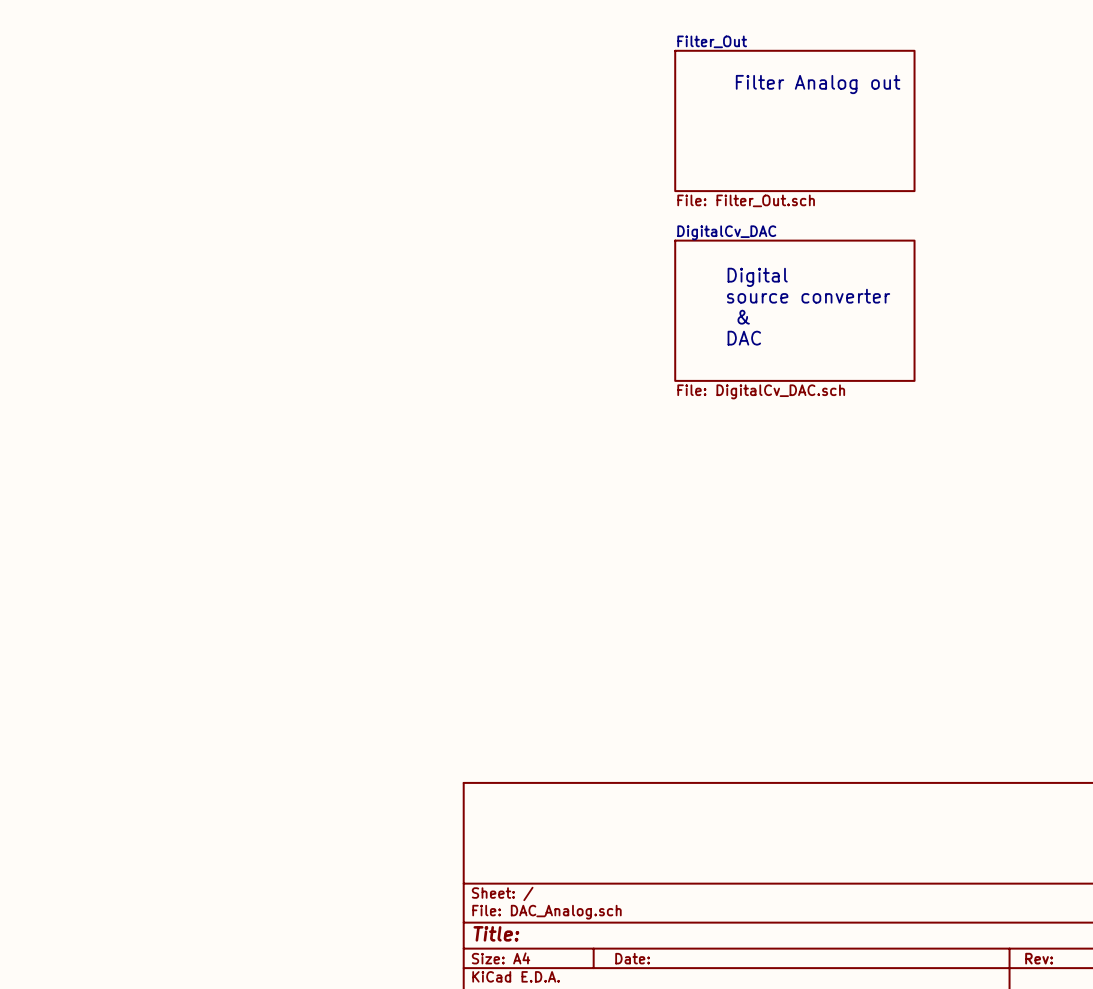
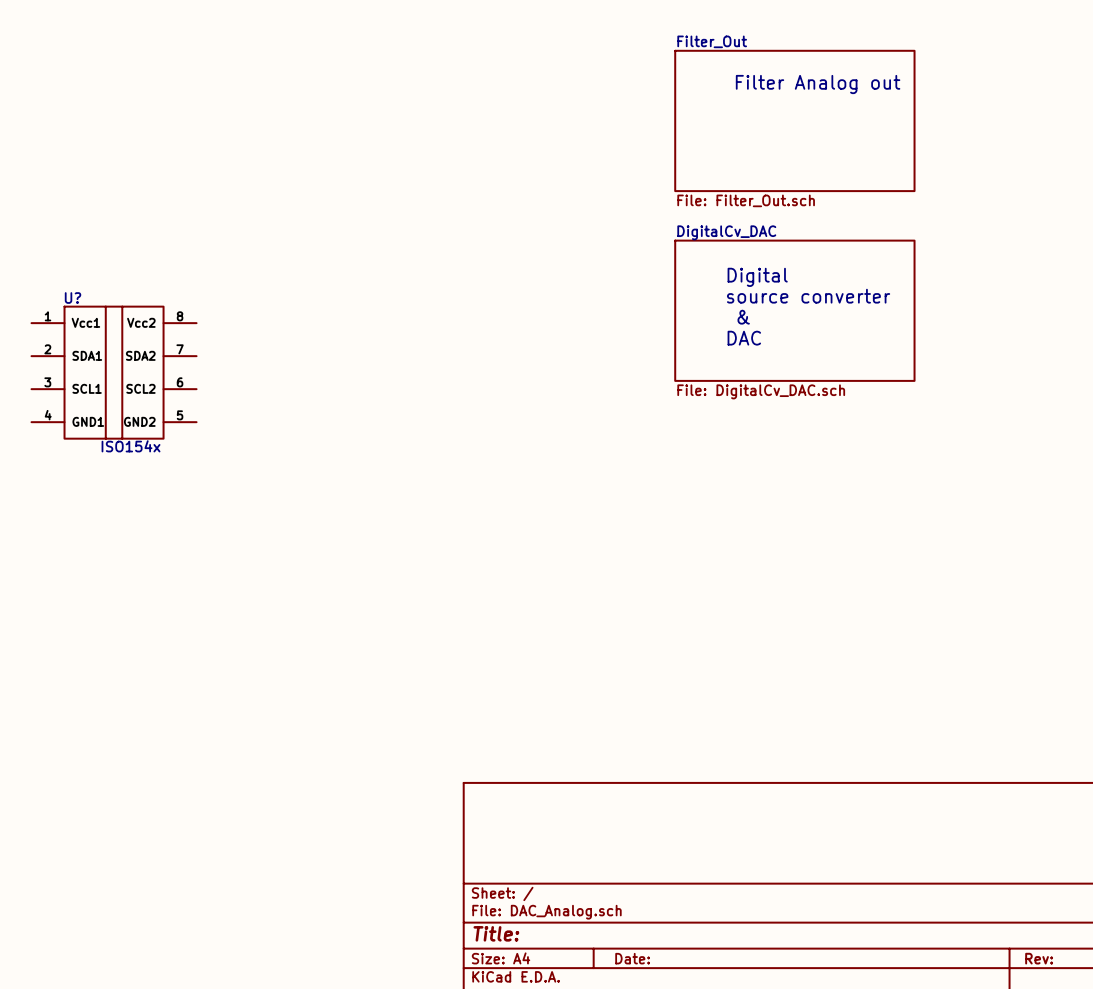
U?: none -> ISO154x (114, 372)

